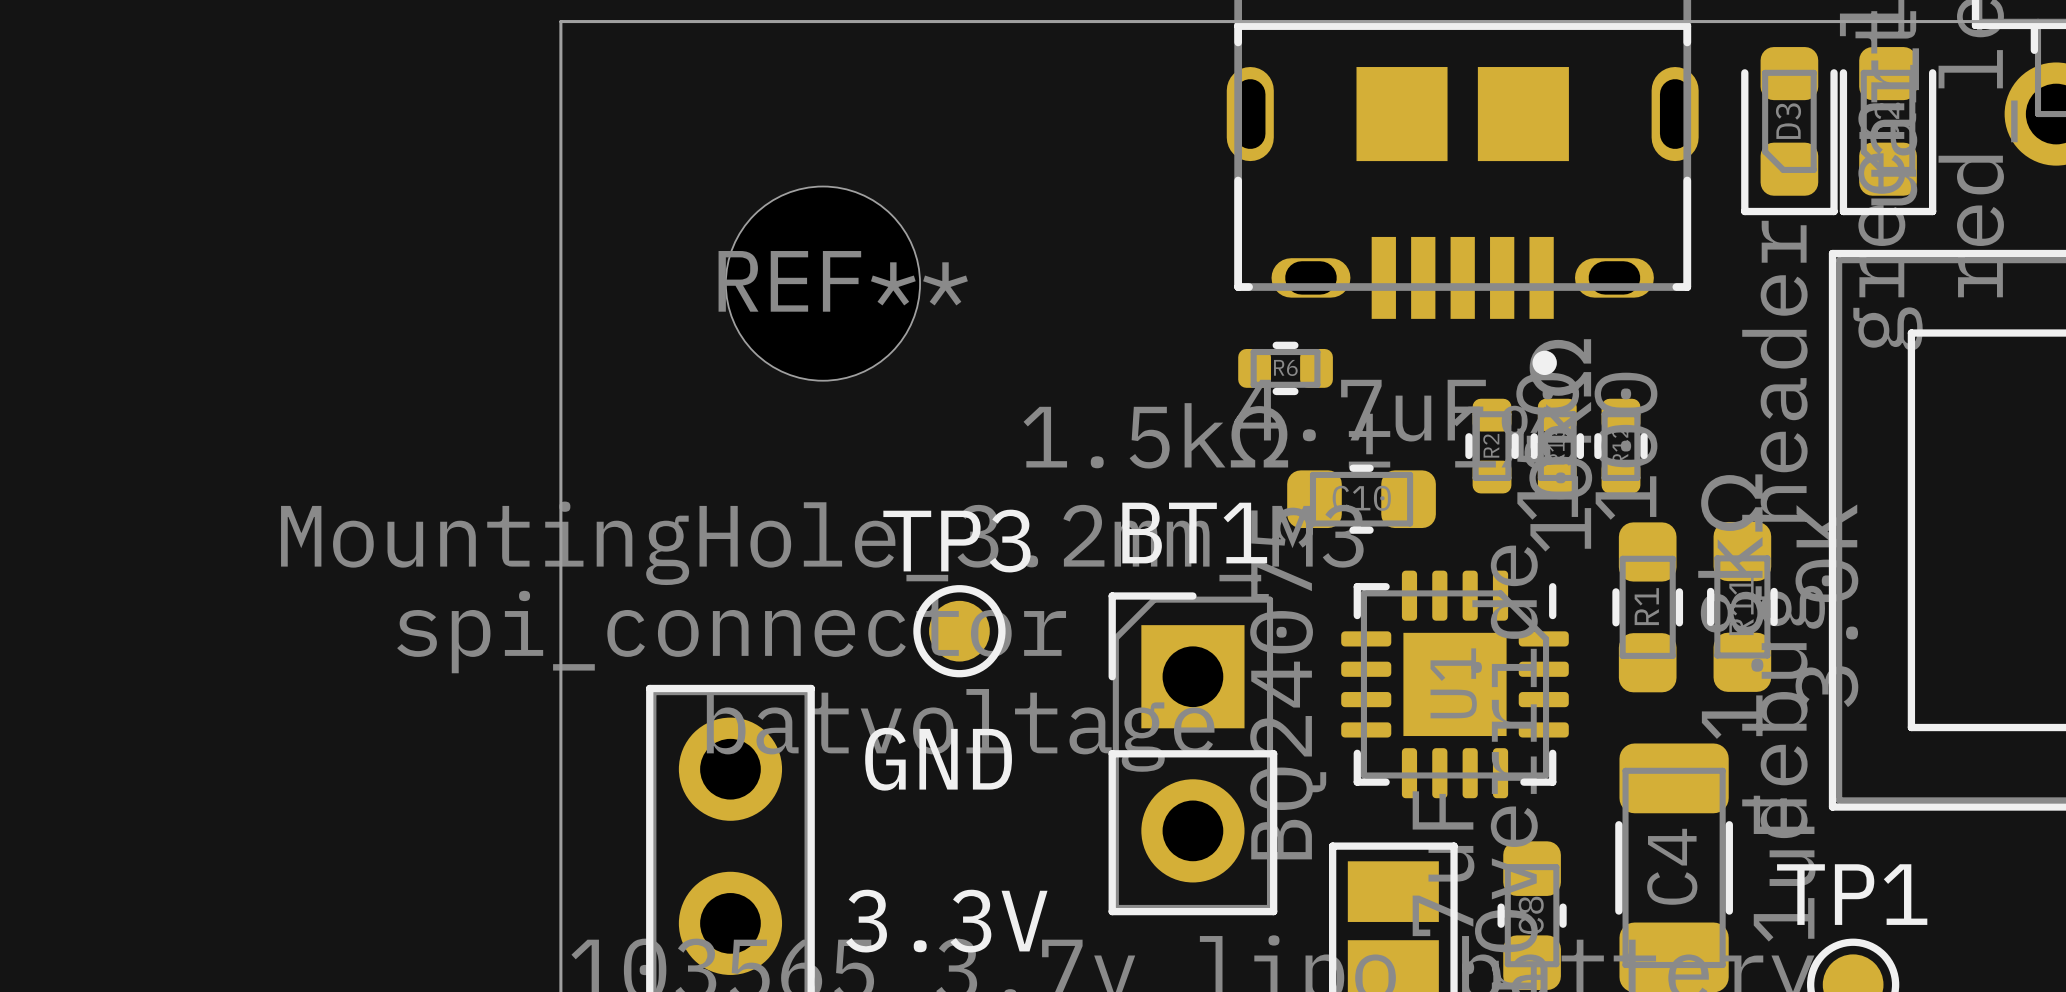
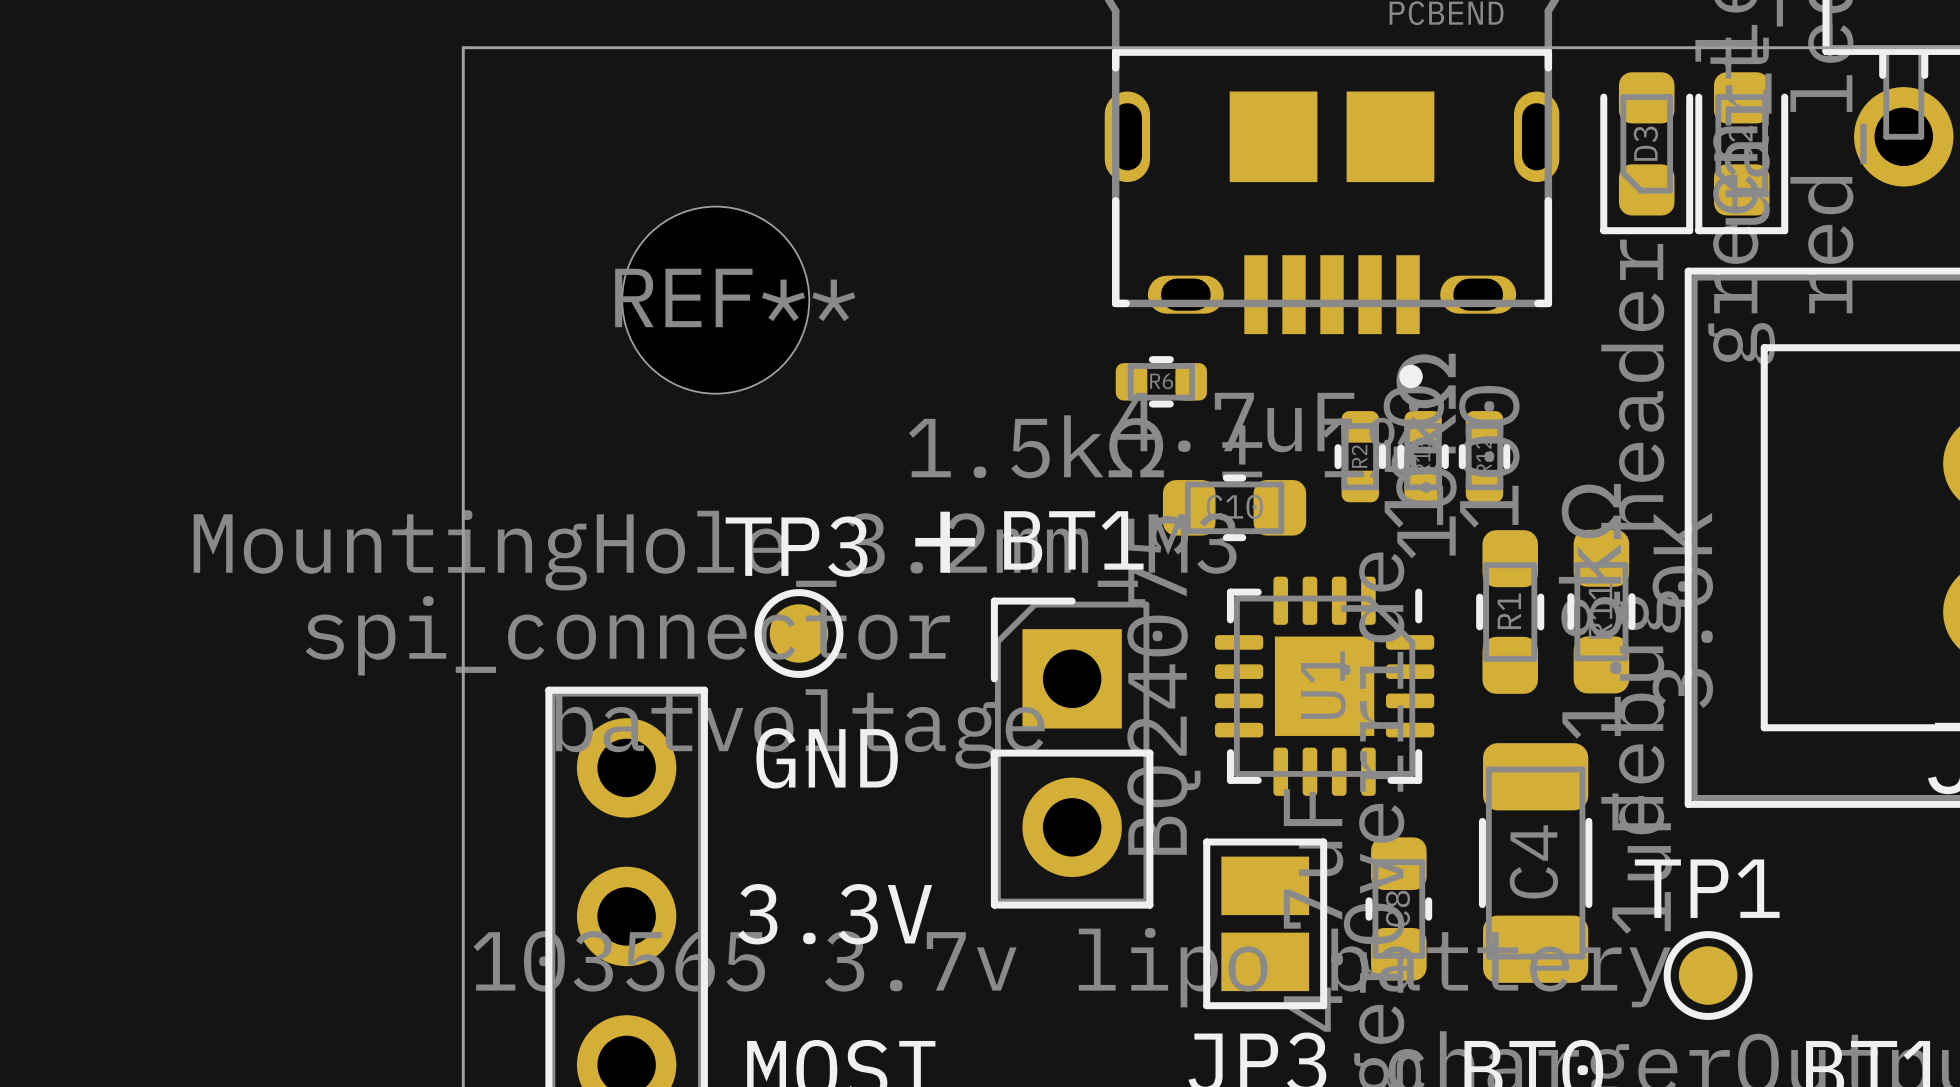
text: none -> + (945, 542)
TP3 position: (959, 631) -> (798, 633)

